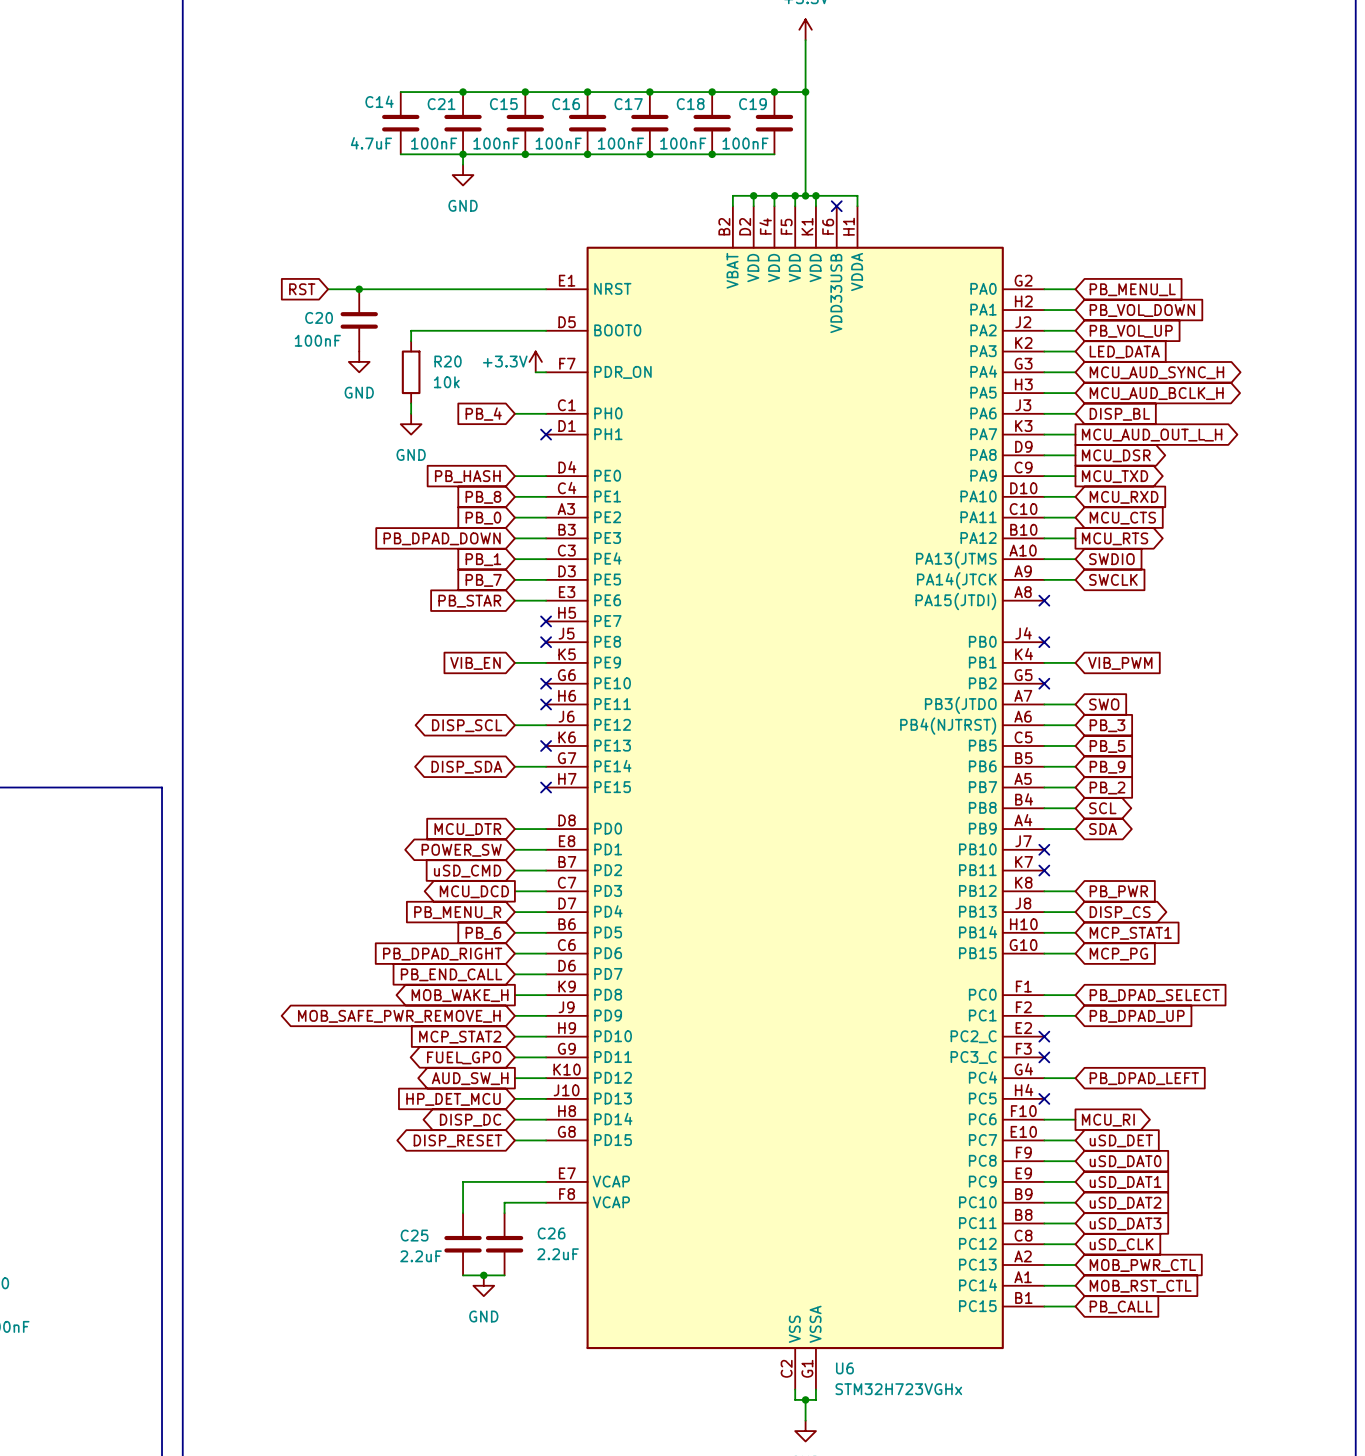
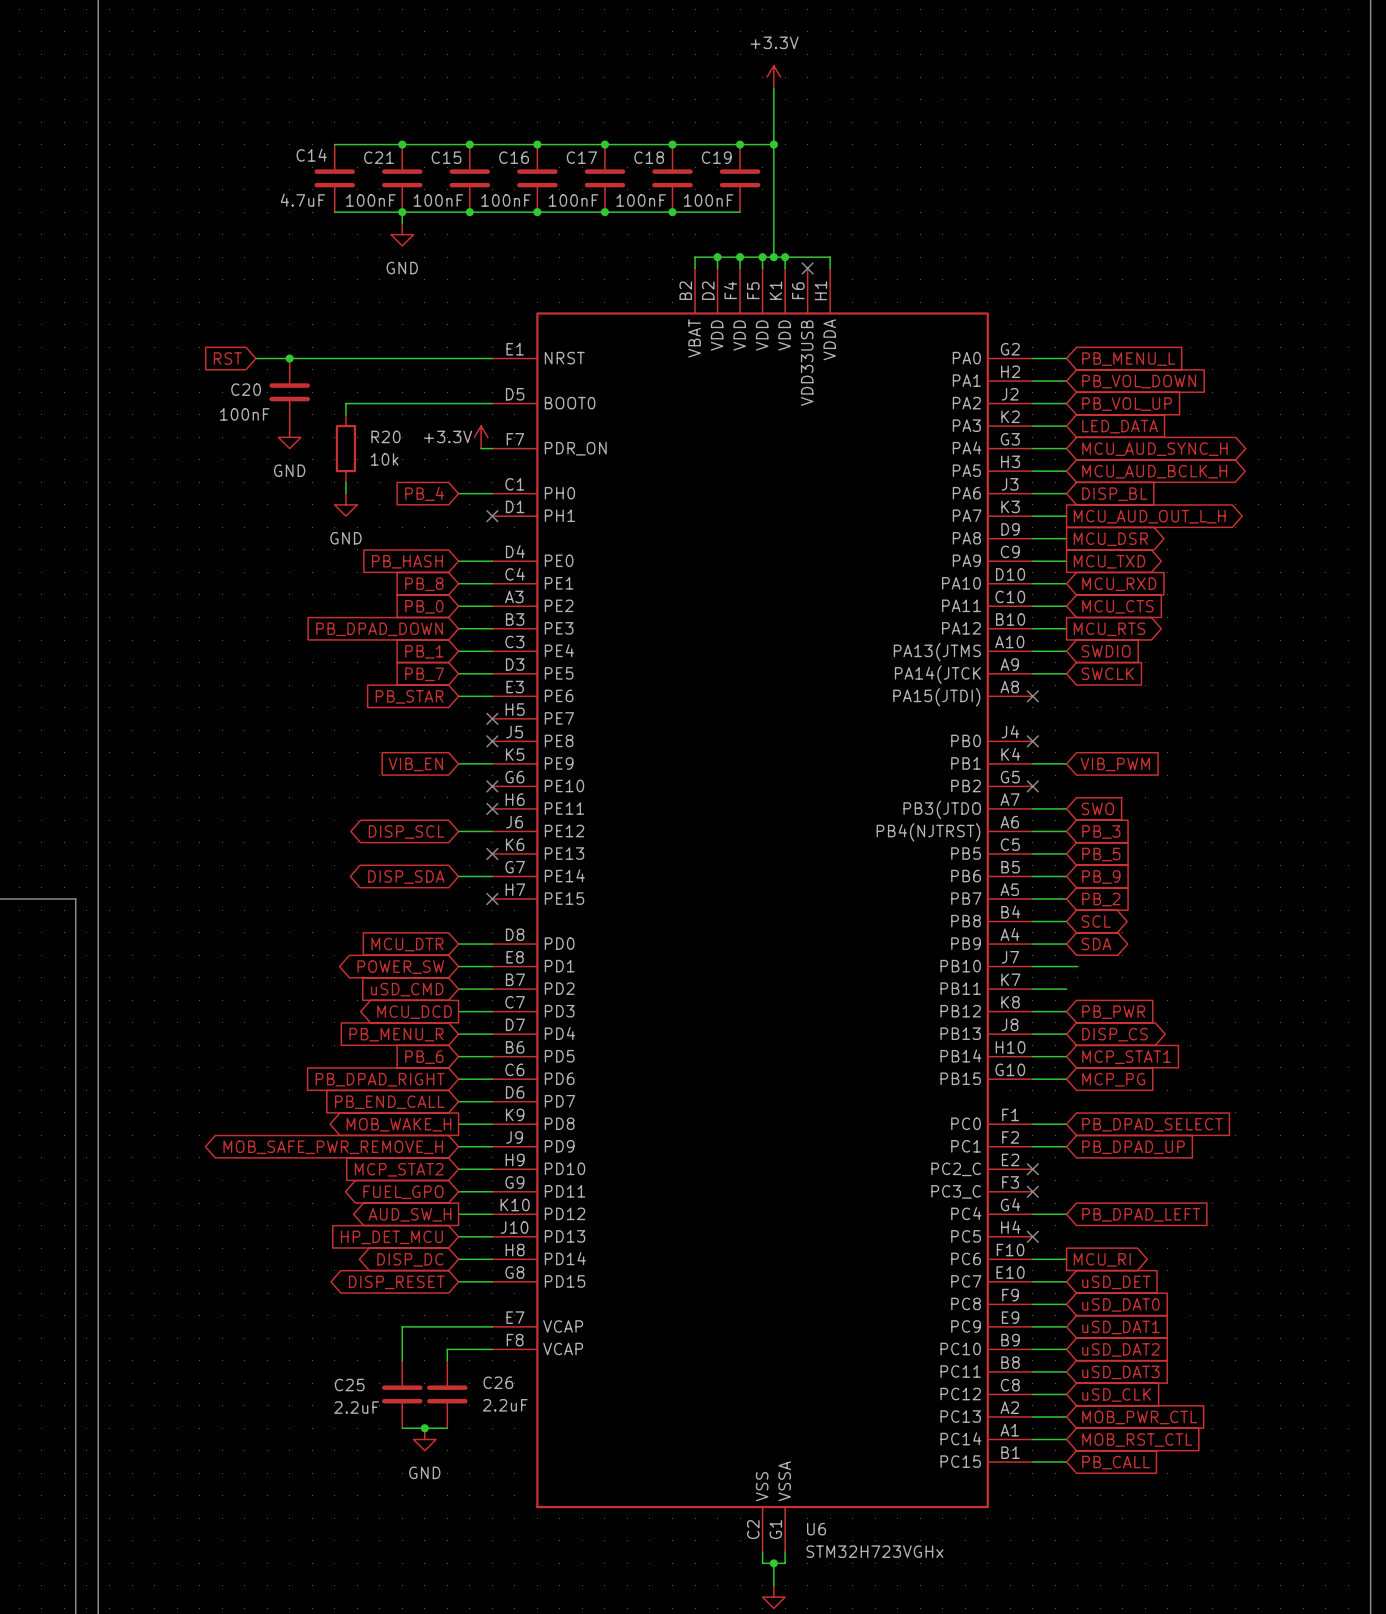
wire: none -> (1032, 966) (1077, 966)
no-connect mark: (1044, 849) -> none
wire: none -> (1032, 989) (1066, 989)
no-connect mark: (1044, 870) -> none

